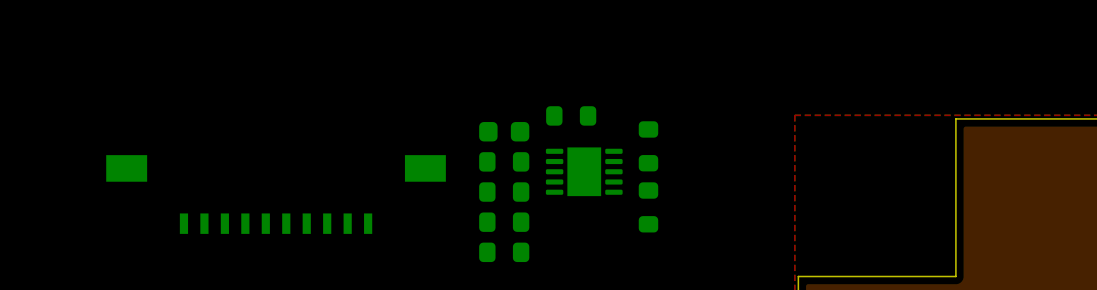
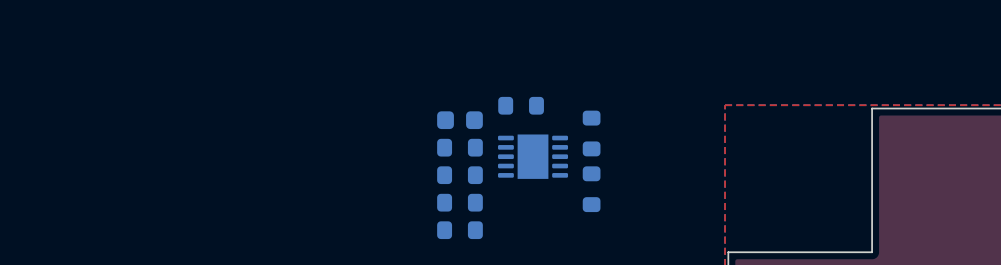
part: (276, 194) -> none

